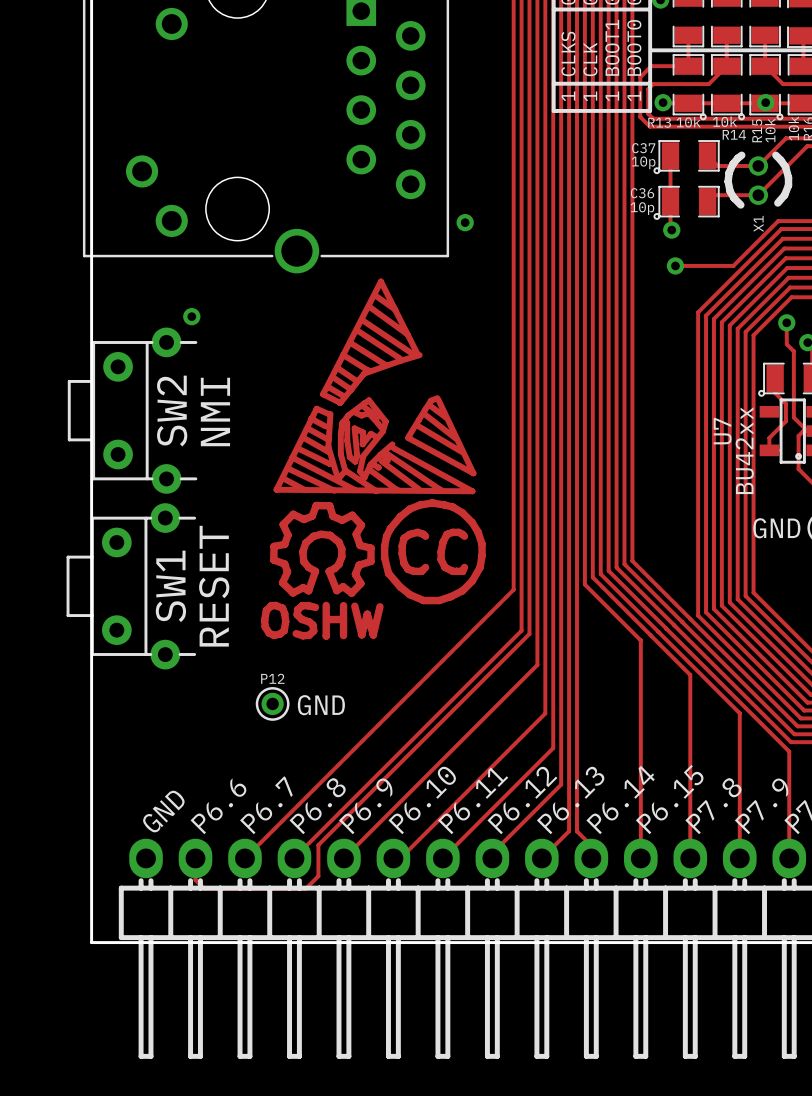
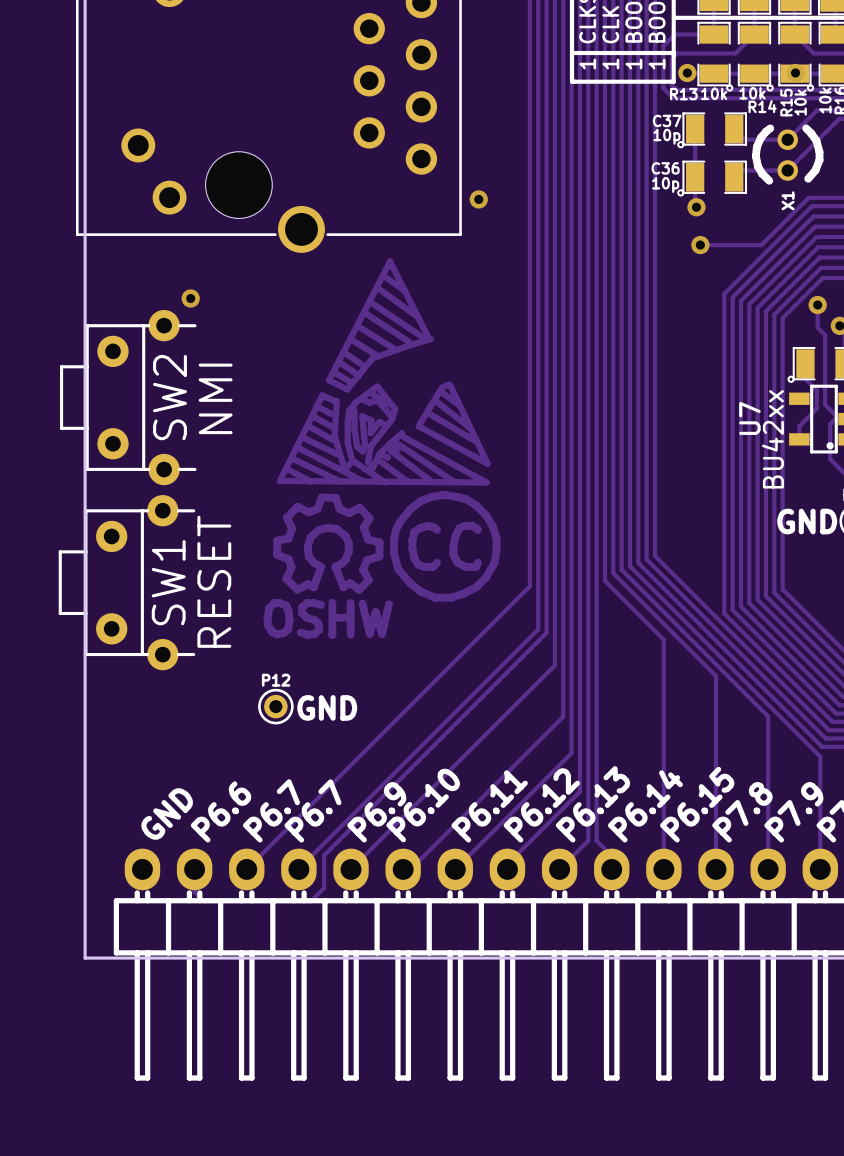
text position: P6.10 (422, 800) -> P6.10 (423, 805)
text: P6.8 (317, 806) -> P6.7 (312, 810)

